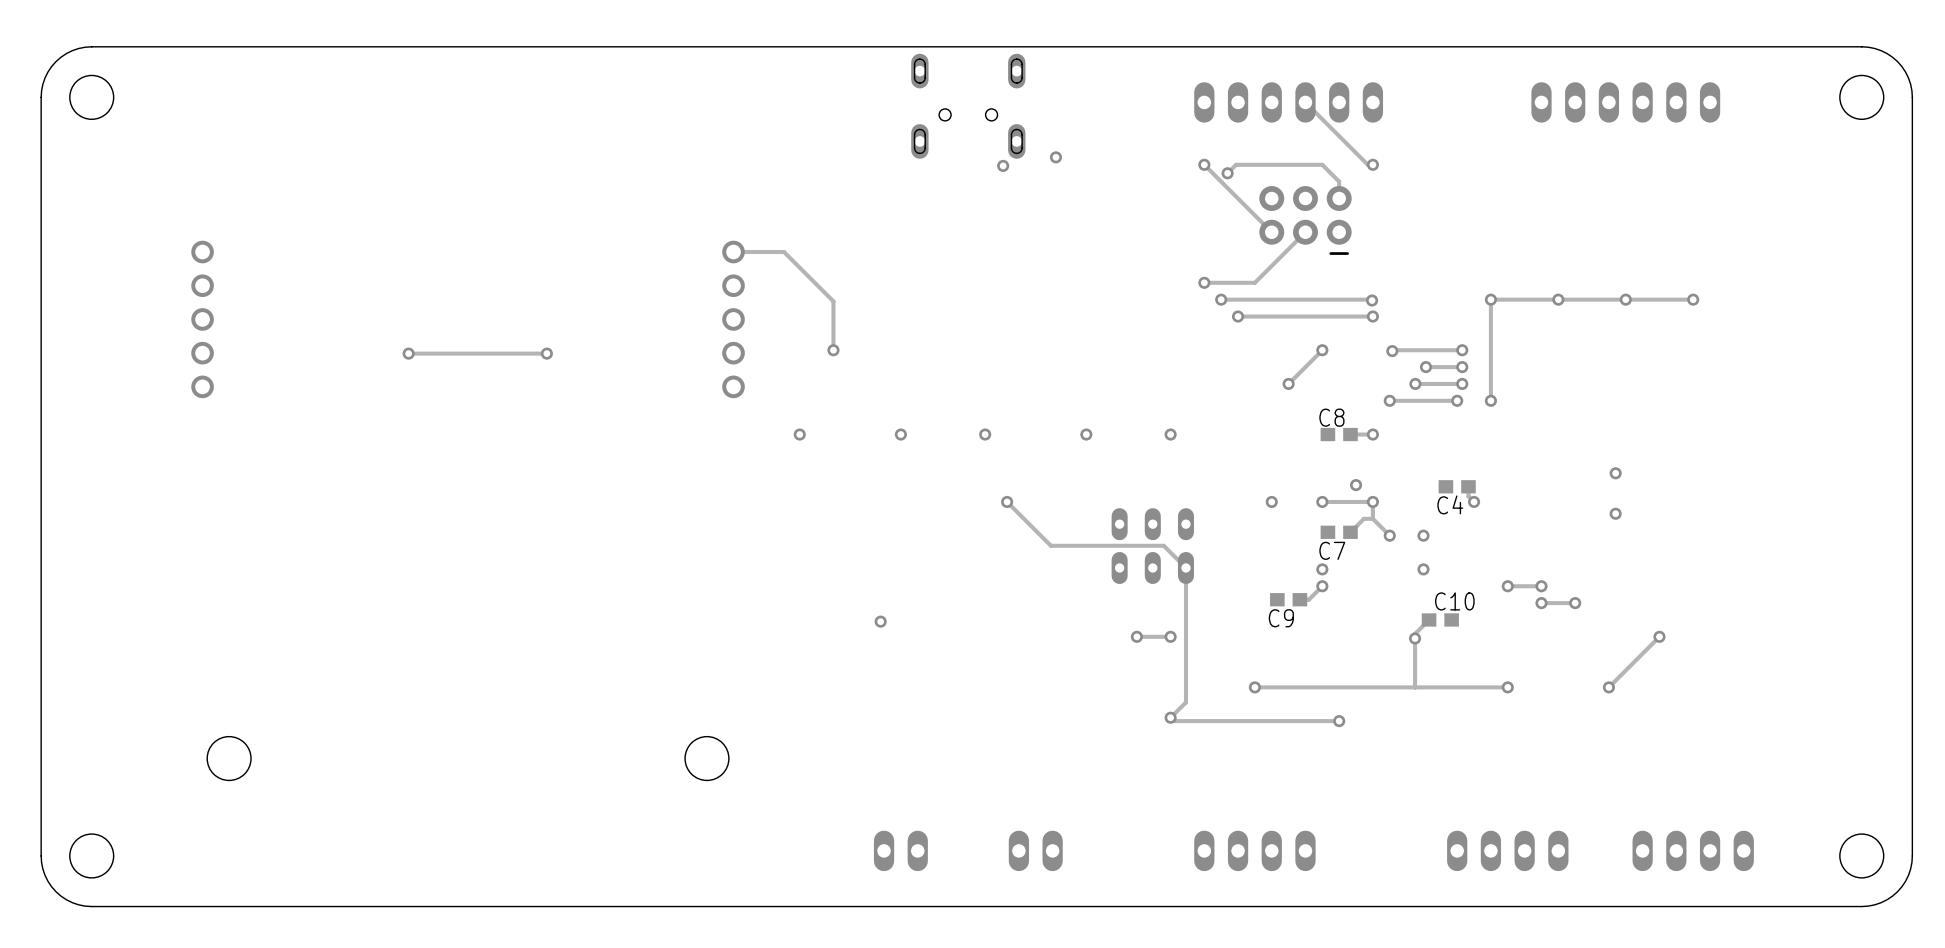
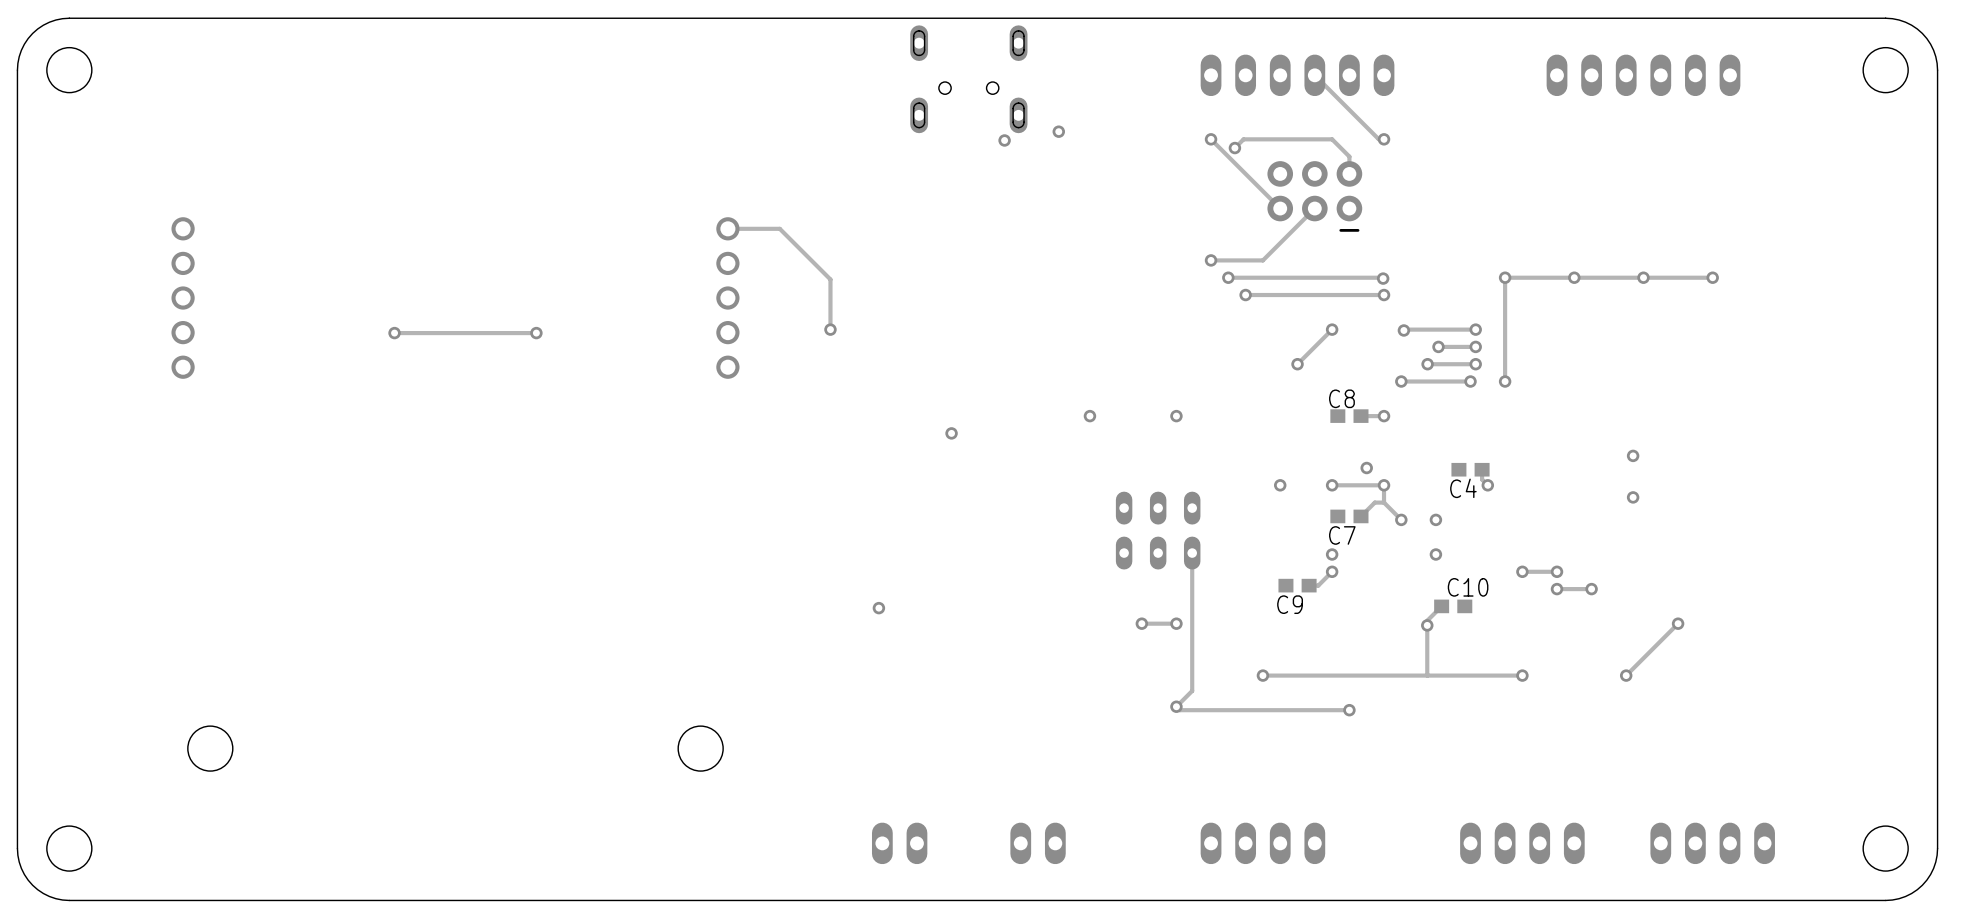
via: (799, 434) -> none
via: (900, 434) -> none
via: (985, 434) -> none
via: none -> (951, 433)
track: (1007, 501) (1050, 545) (1163, 545) (1185, 567) -> none
via: (1007, 501) -> none

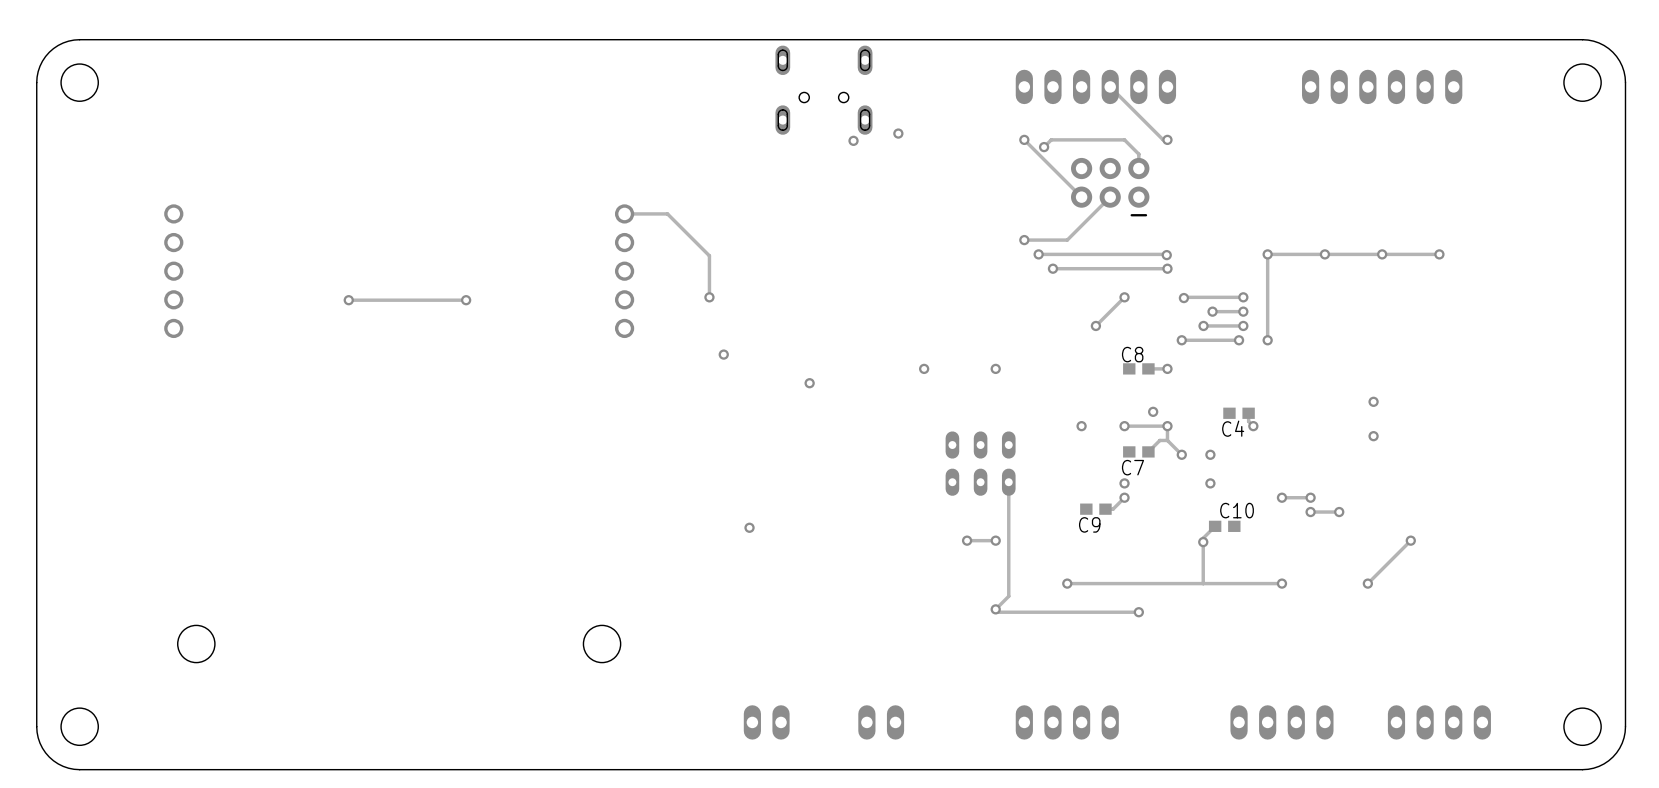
via: none -> (723, 354)

